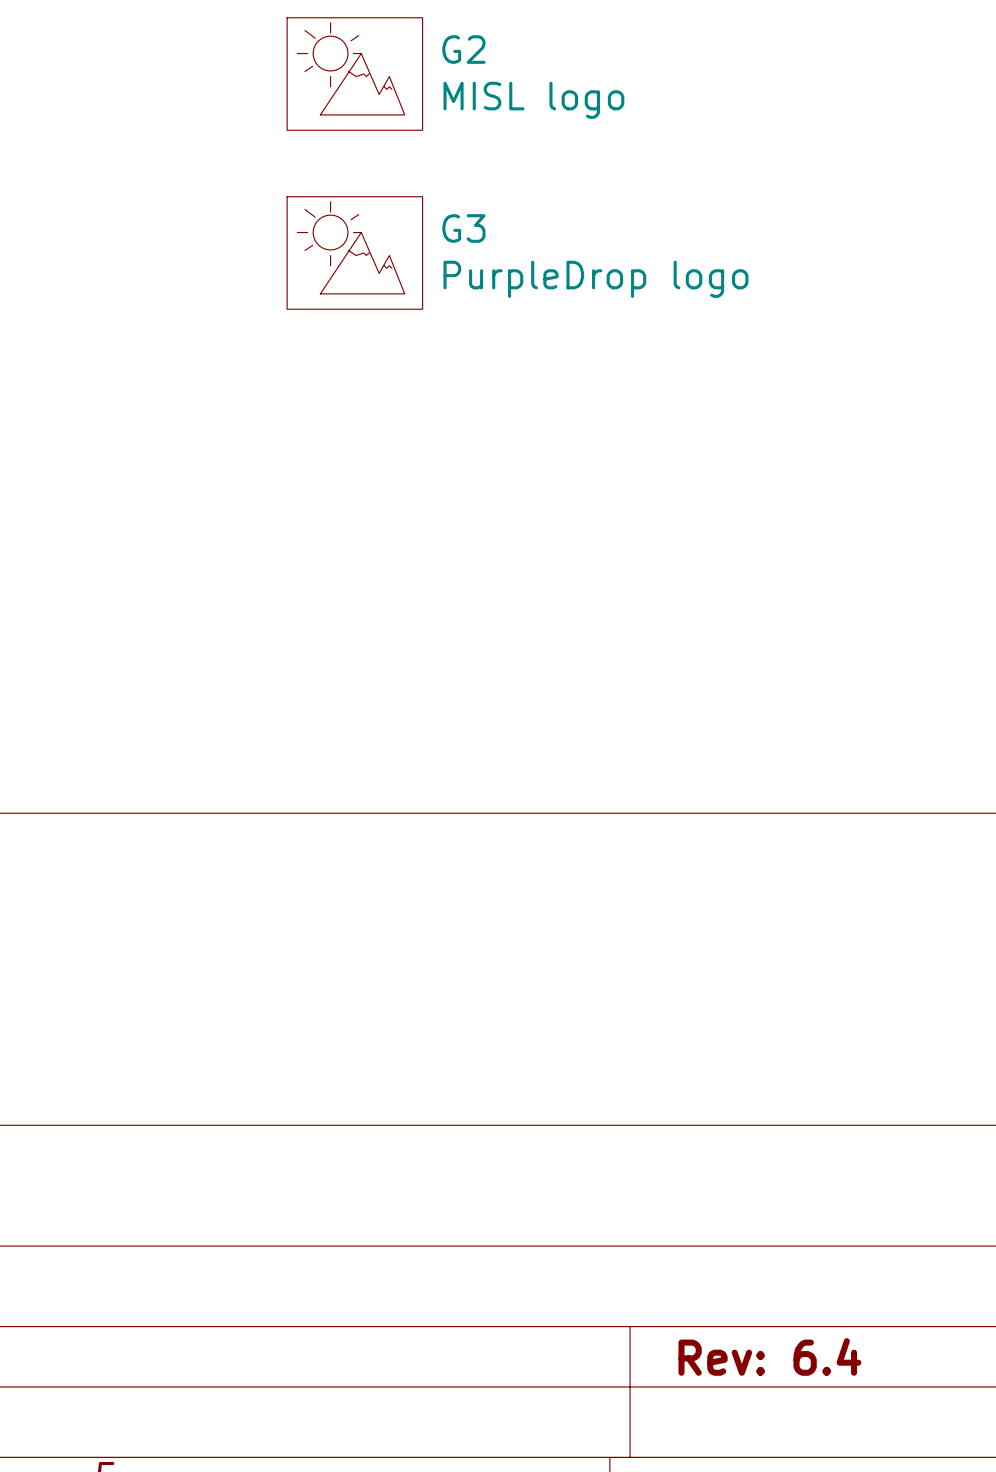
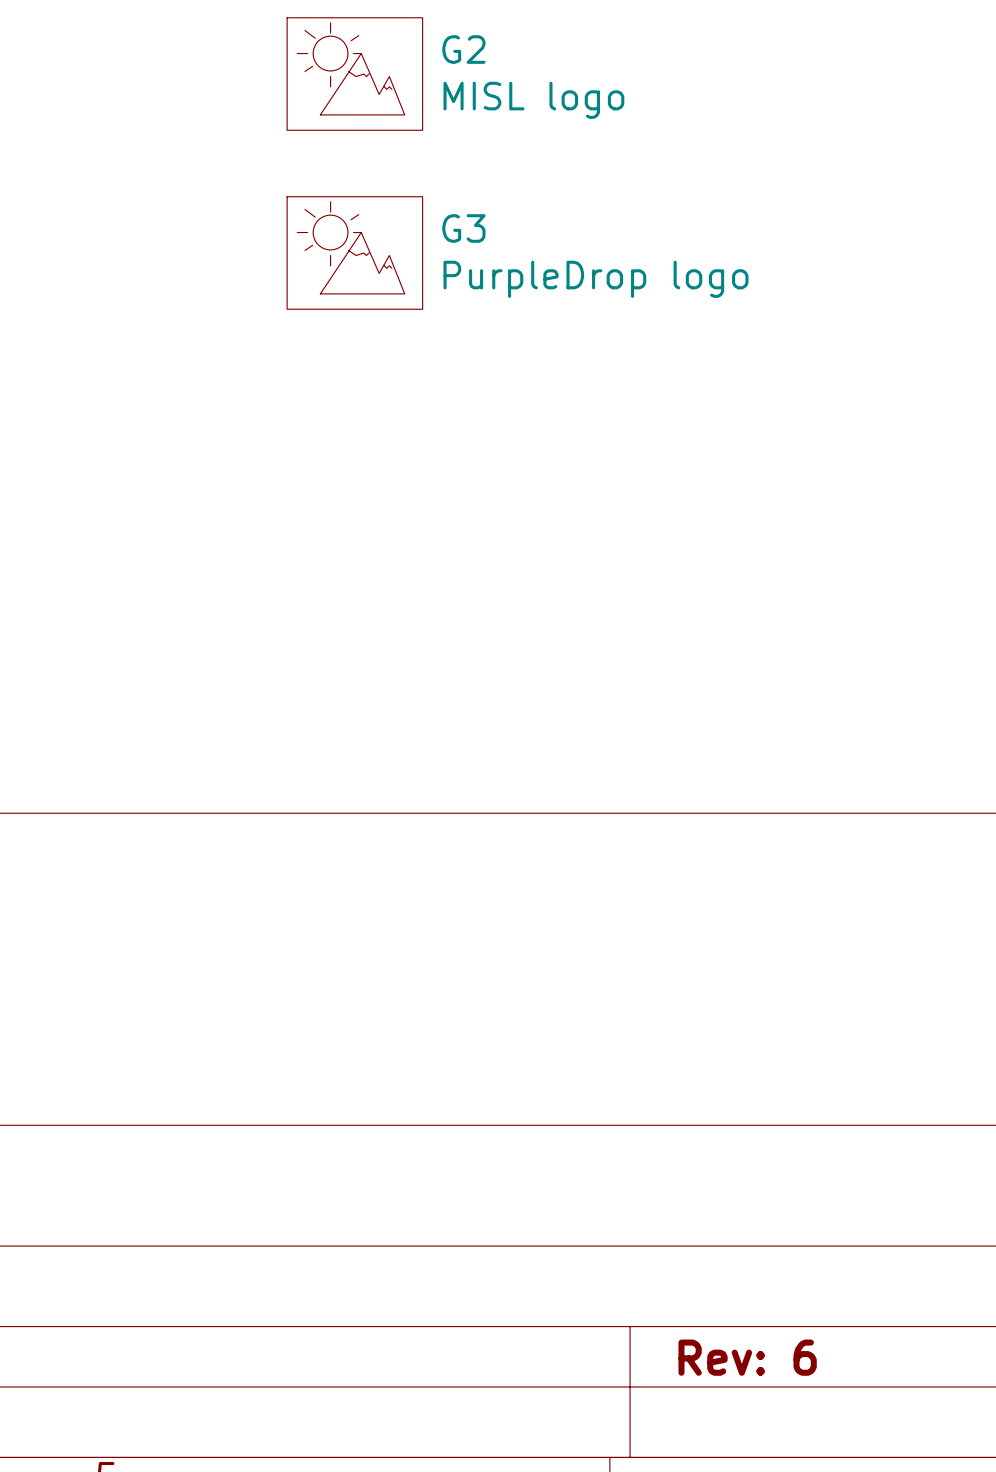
title block: Rev: 6.4 (769, 1356) -> Rev: 6 (747, 1357)

